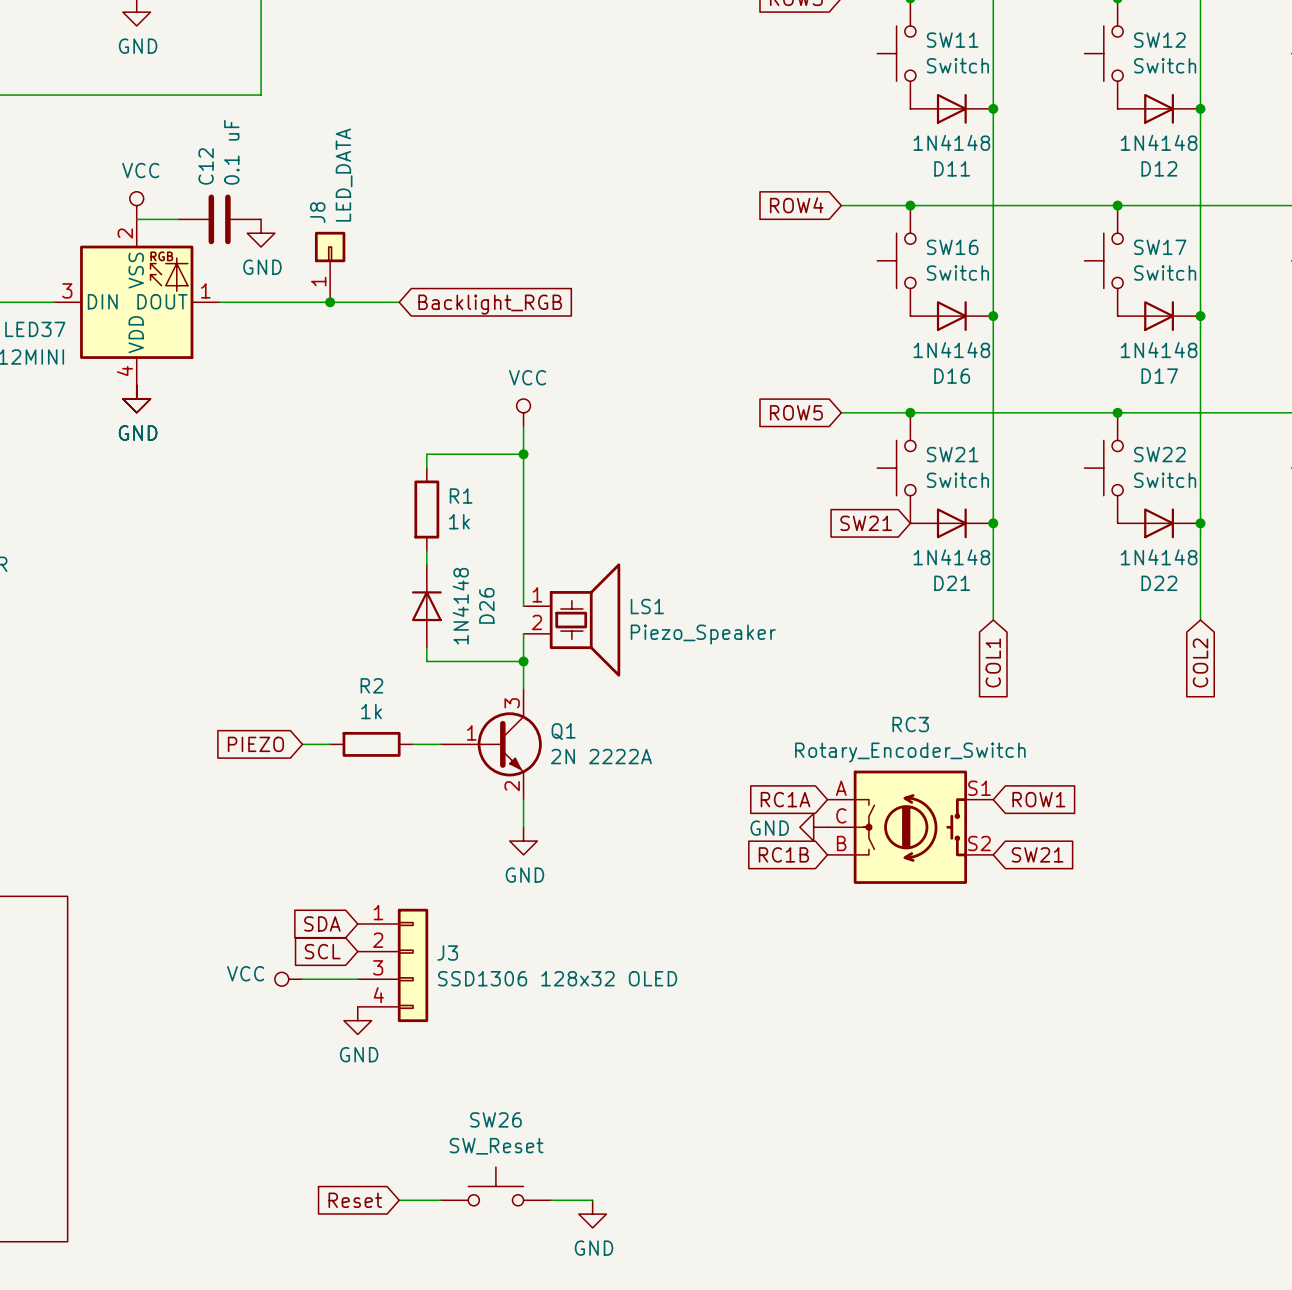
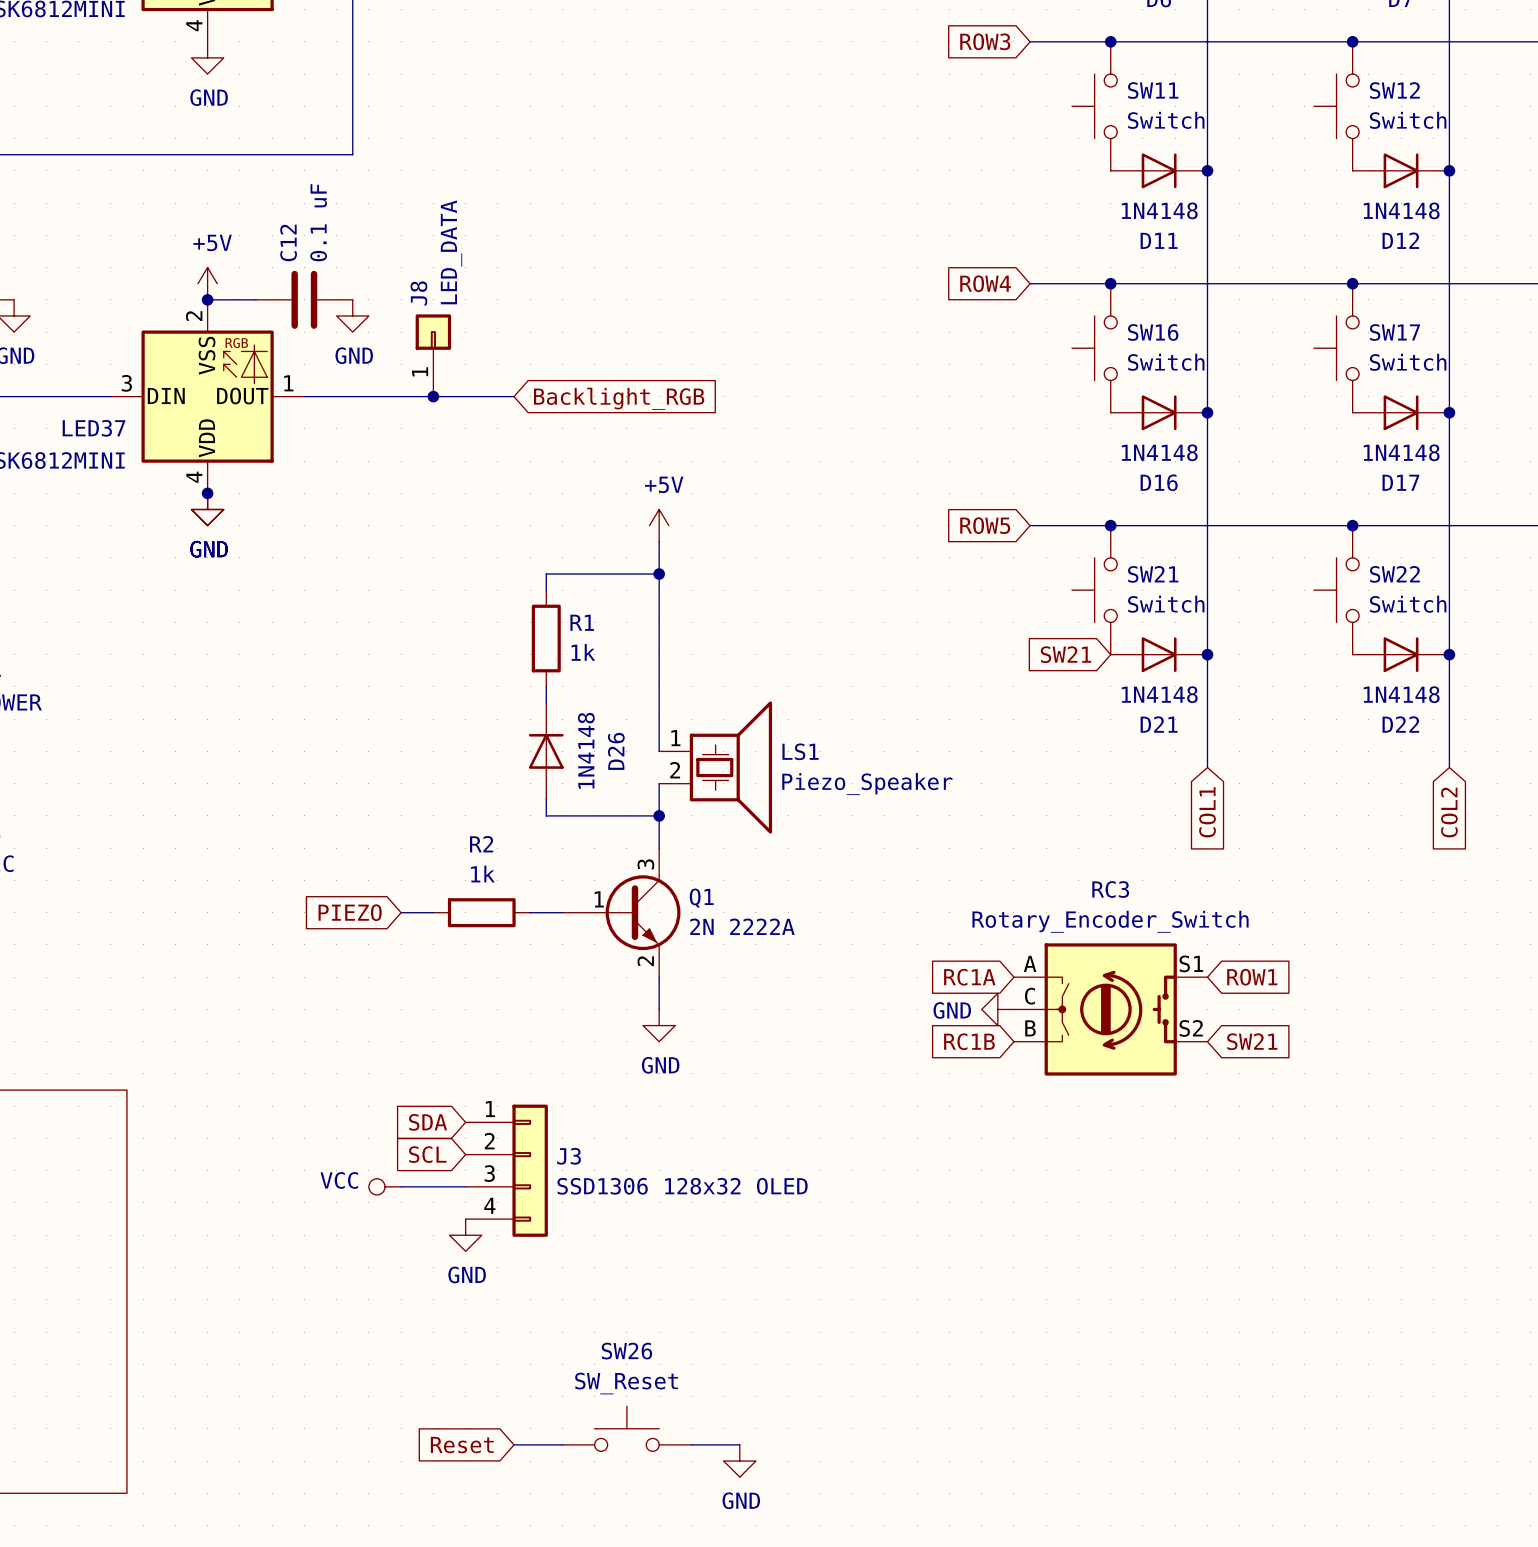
power symbol: VCC (136, 205) -> +5V (207, 283)
junction: none -> (207, 299)
junction: none -> (207, 493)
power symbol: VCC (523, 412) -> +5V (659, 525)

